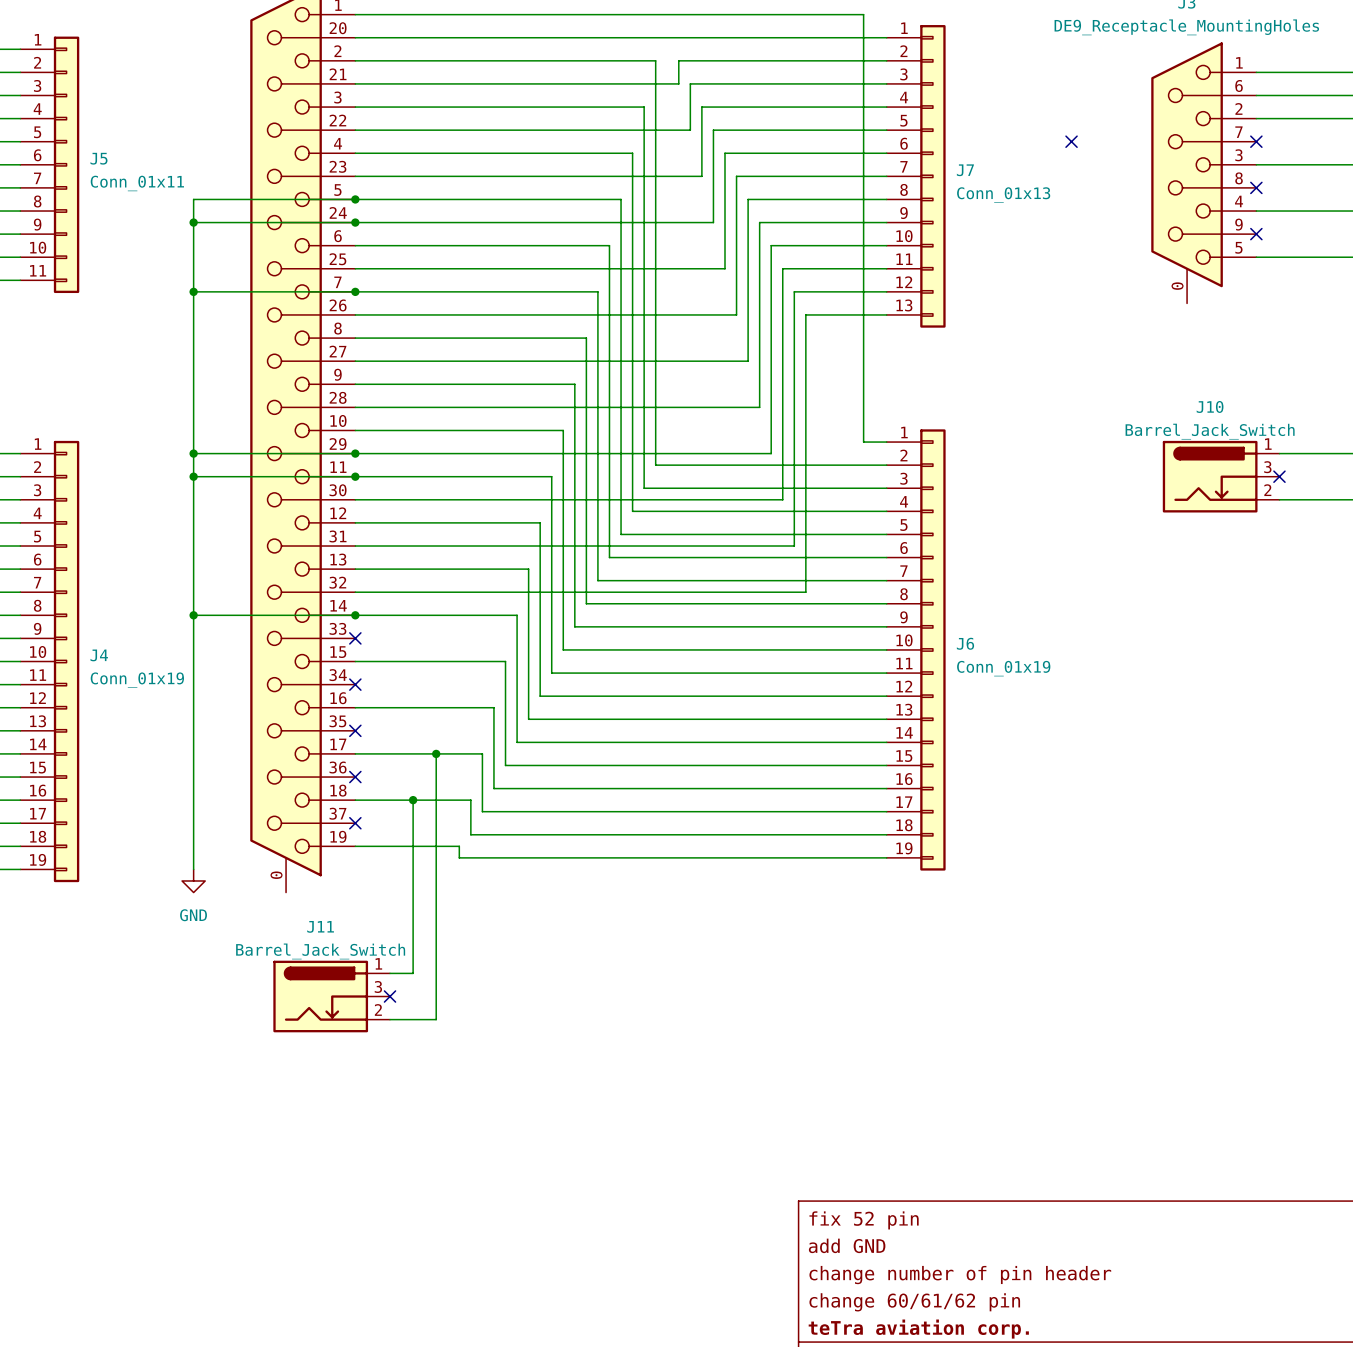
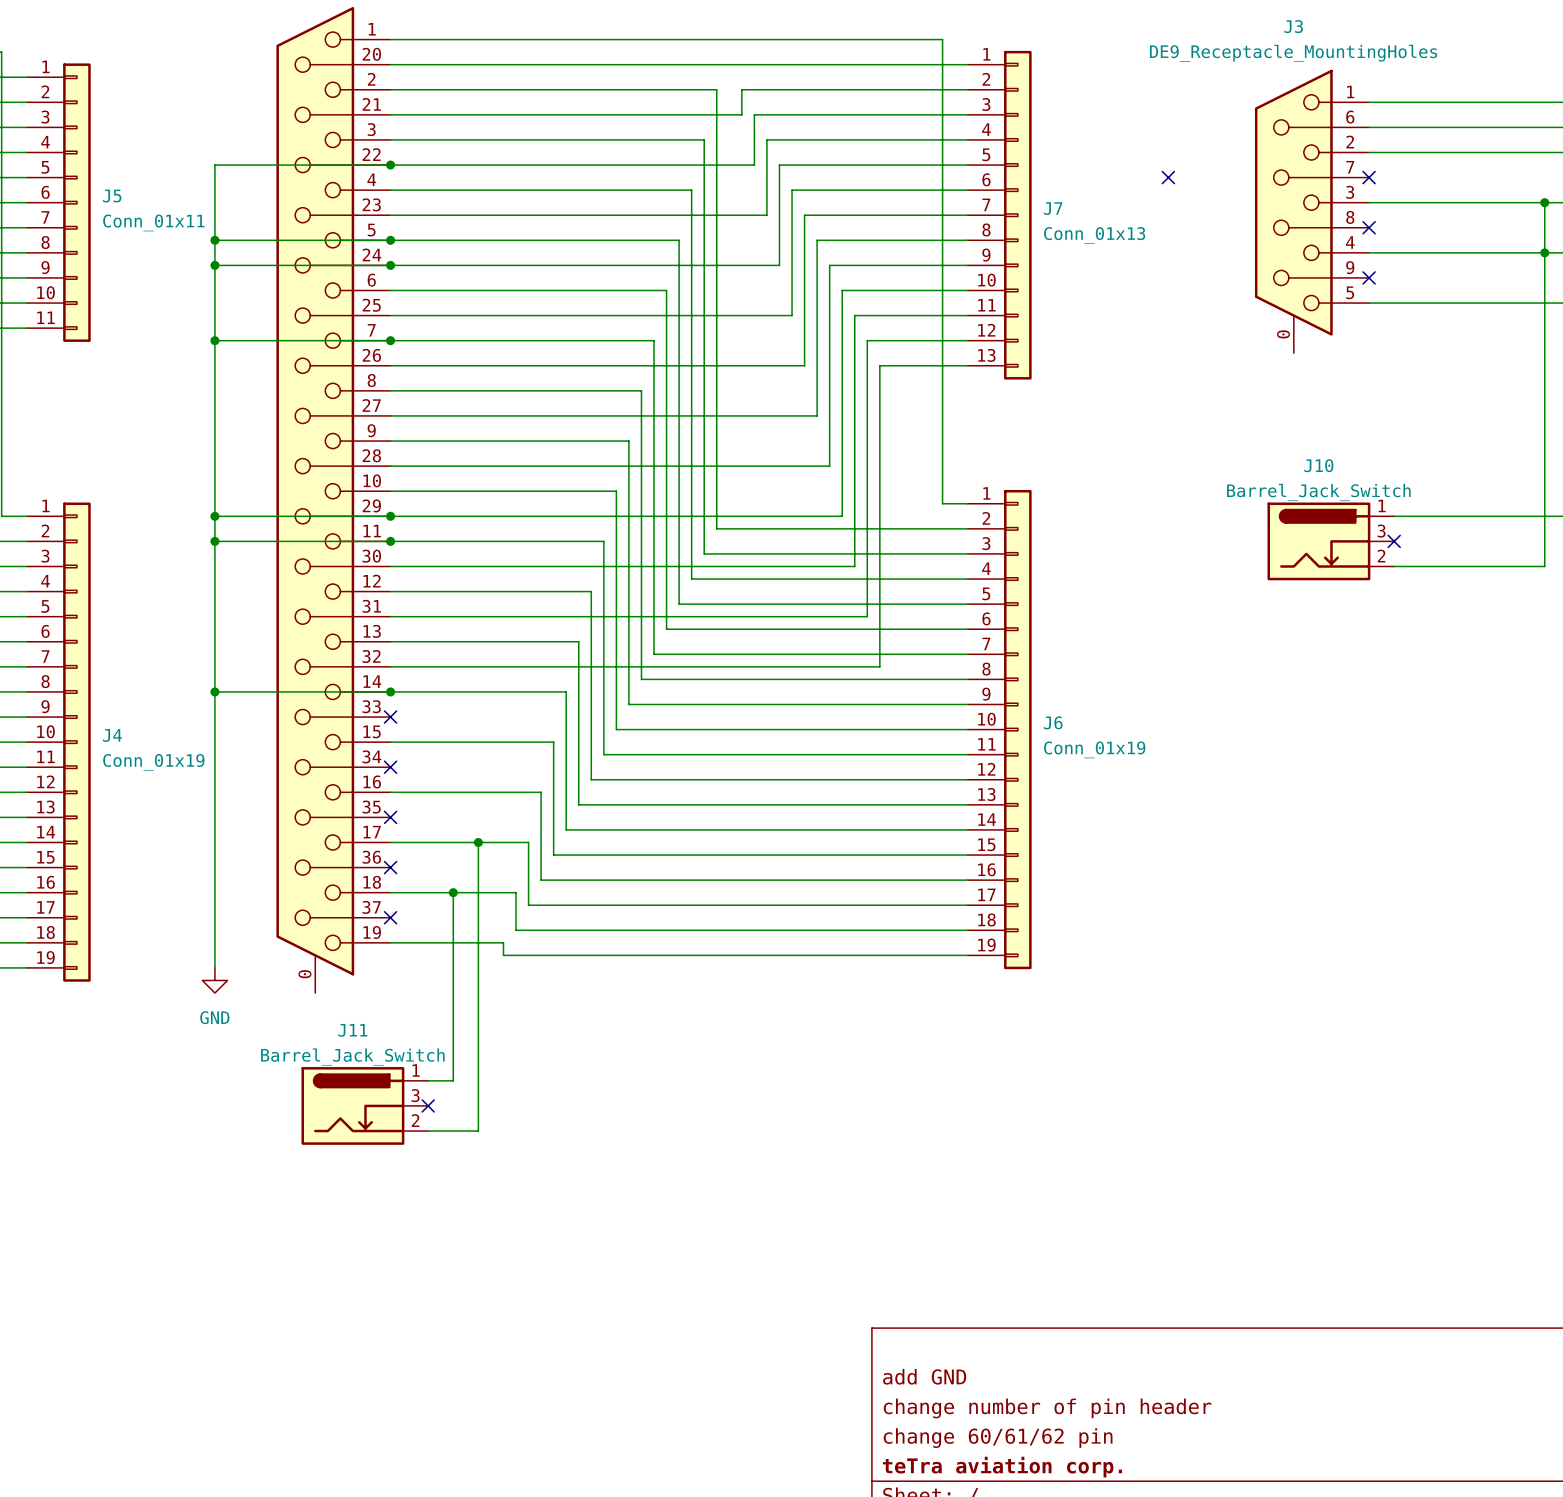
wire: none -> (390, 165) (214, 165) (214, 240)
junction: none -> (390, 165)
junction: none -> (214, 240)
title block: fix 52 pin (864, 1220) -> none

